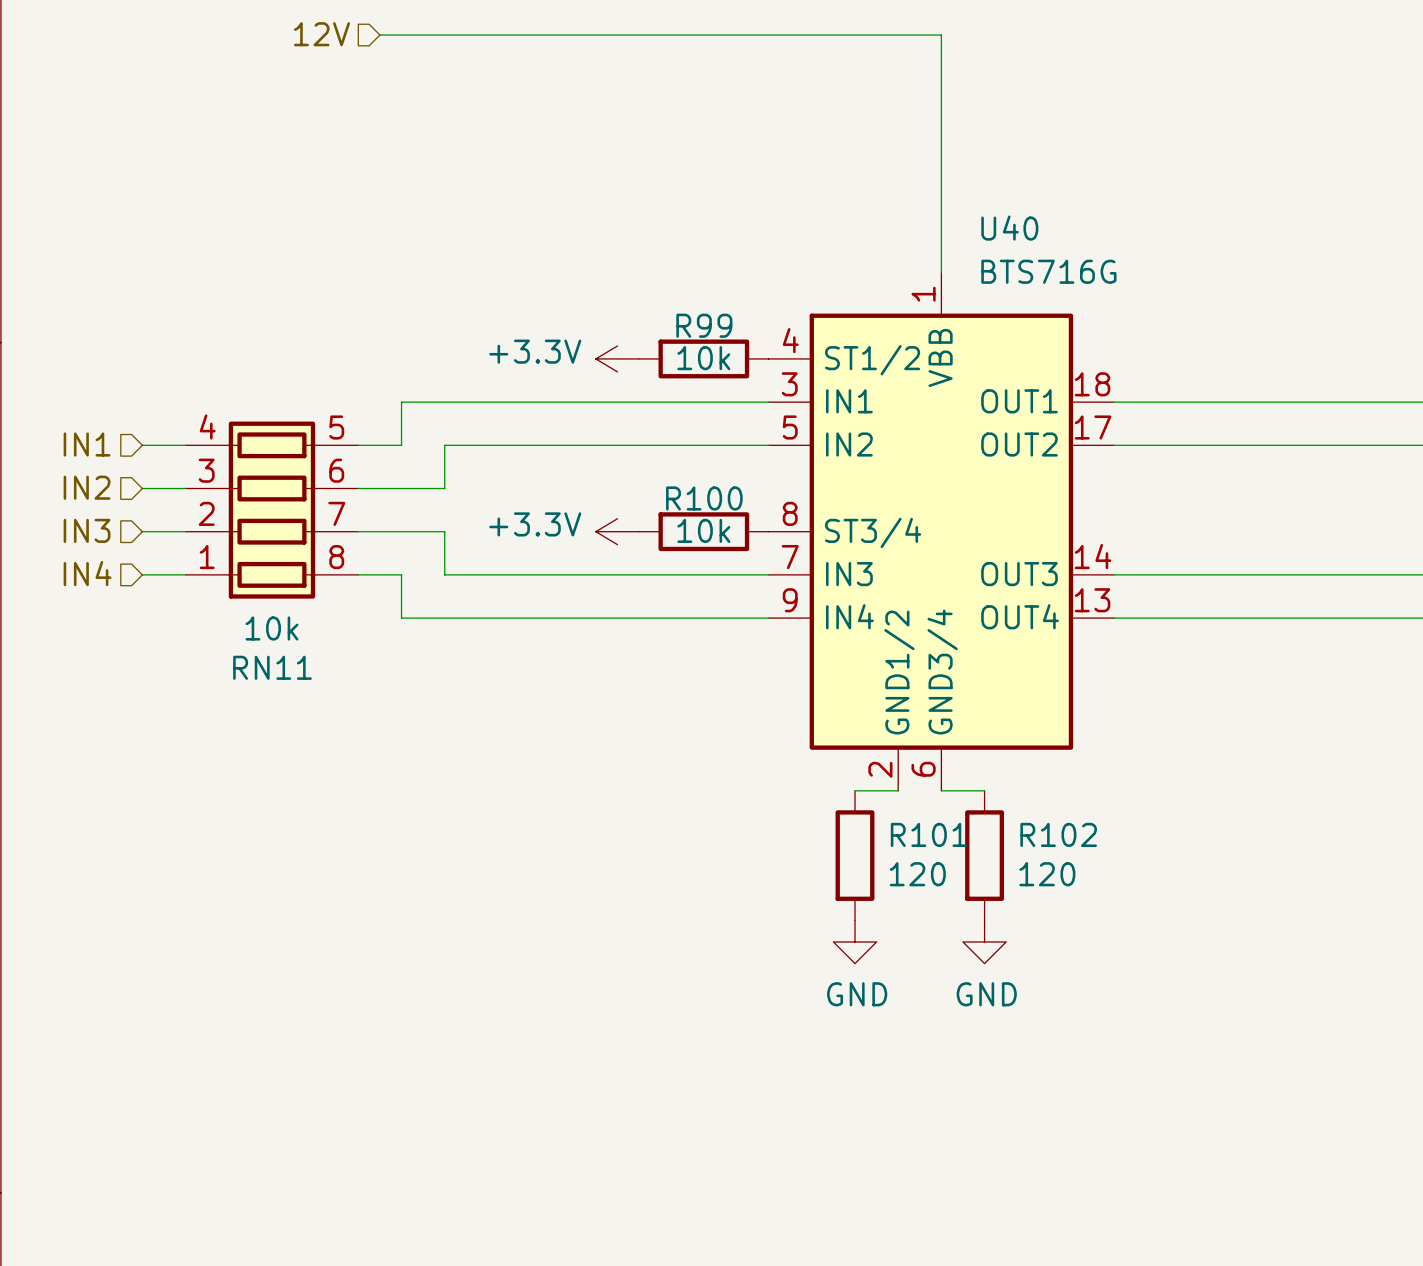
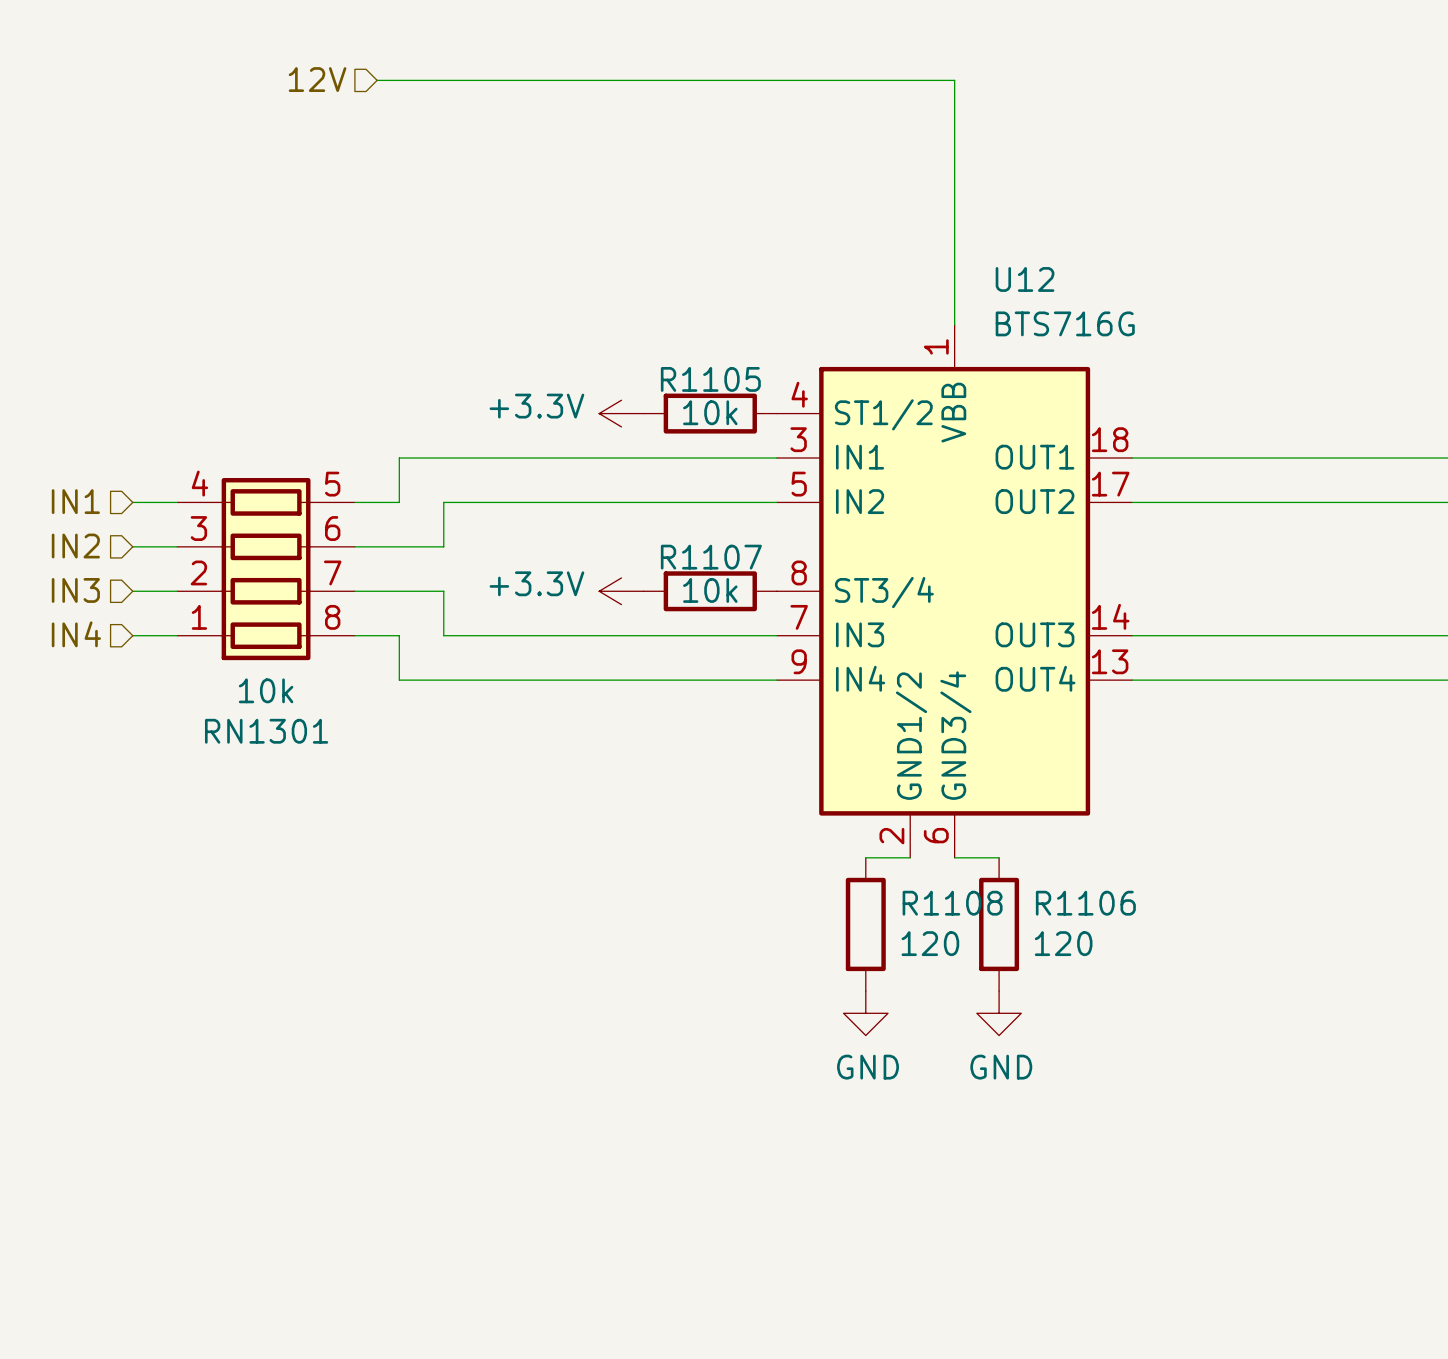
U40 name: U40 (1009, 228) -> U12 (1025, 279)
R99 name: R99 (704, 325) -> R1105 (710, 379)
R100 name: R100 (704, 498) -> R1107 (711, 557)
RN11 name: RN11 (272, 667) -> RN1301 (266, 731)
R101 name: R101 (929, 834) -> R1108 (952, 903)
R102 name: R102 (1058, 834) -> R1106 (1085, 903)

